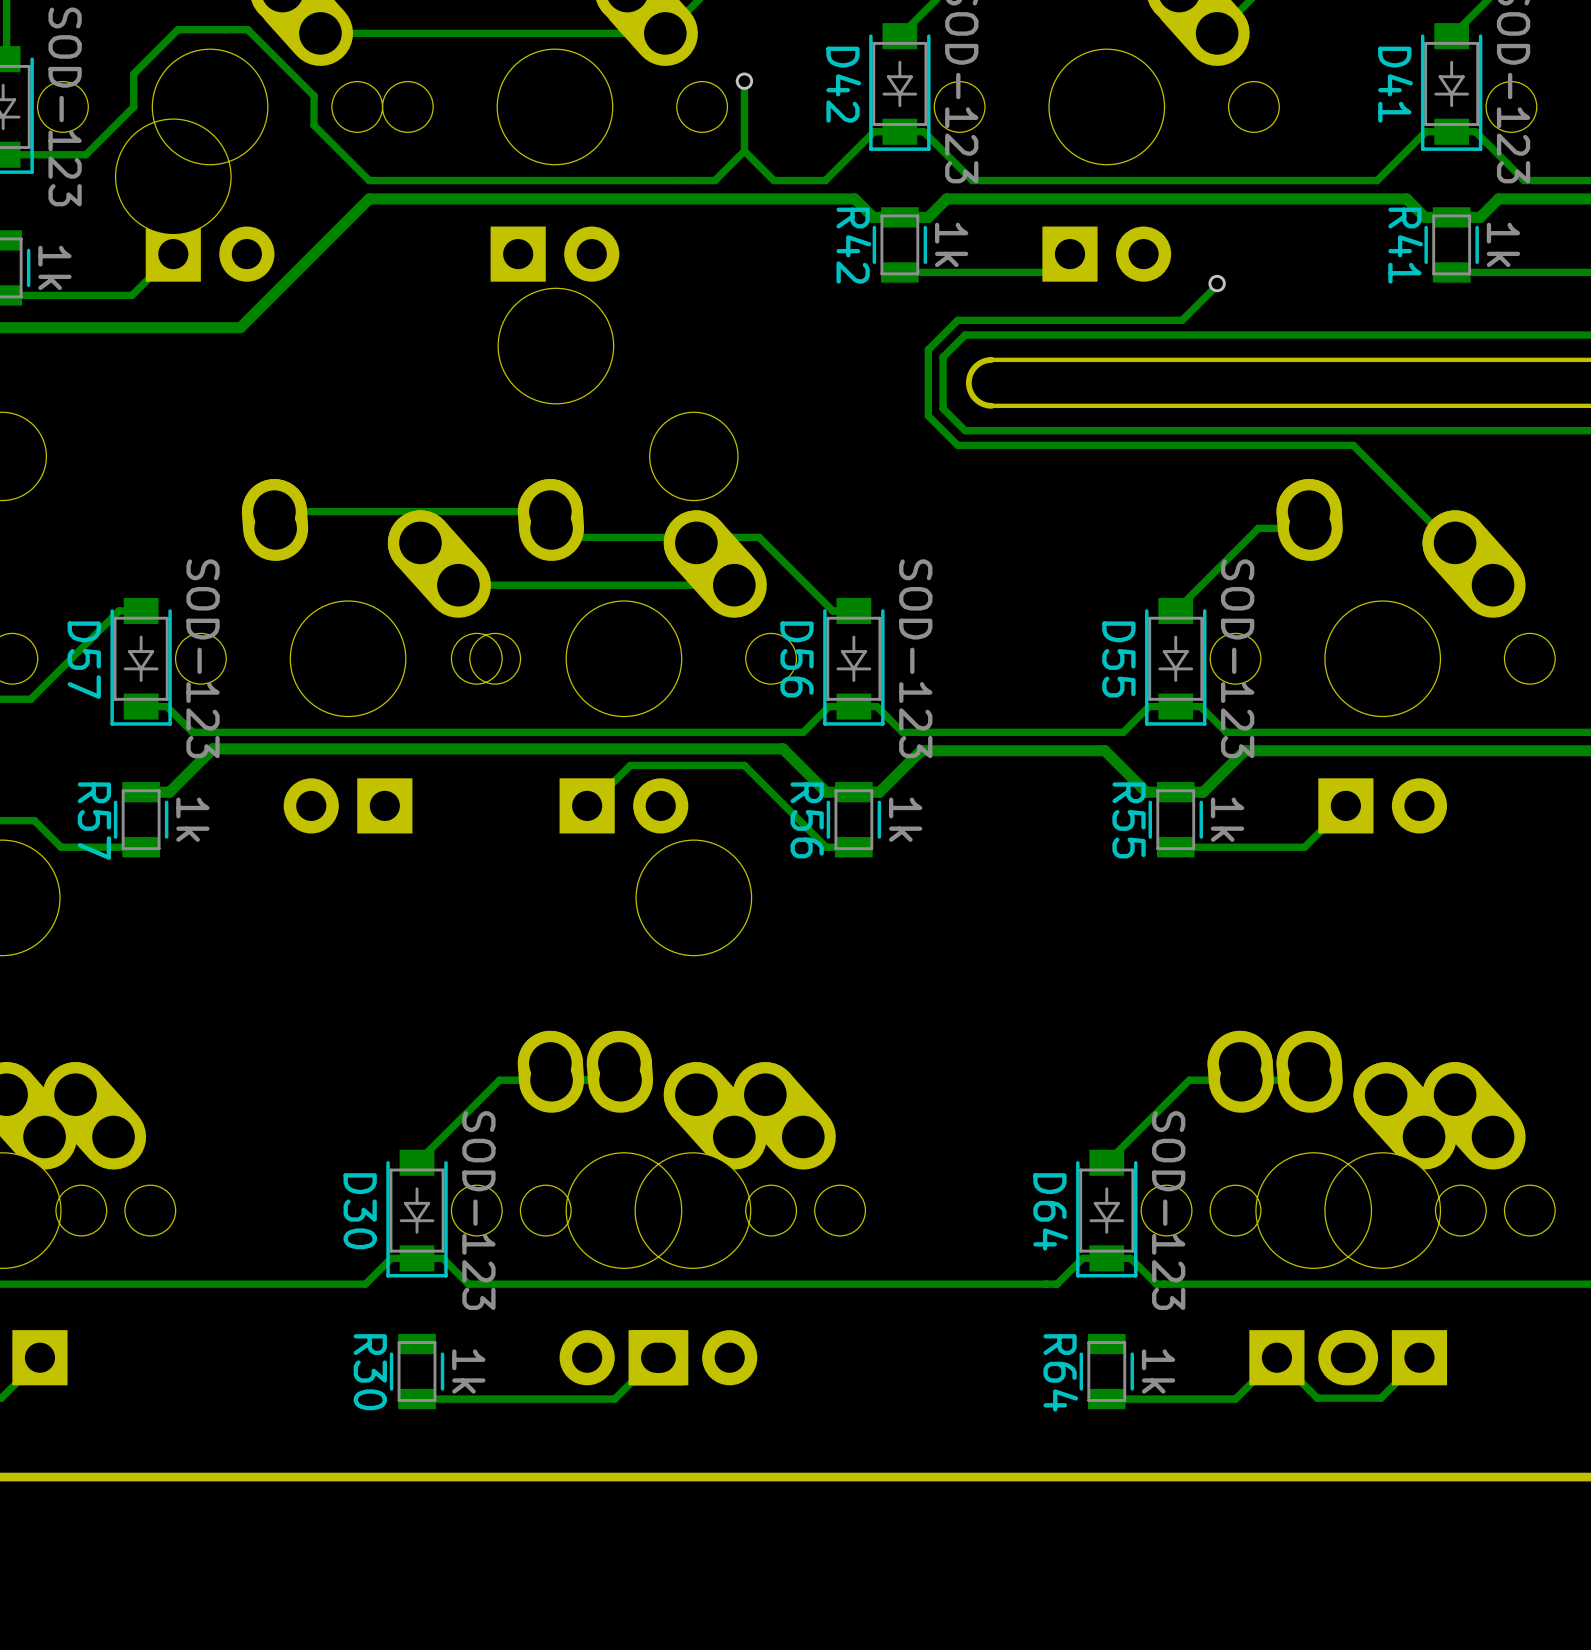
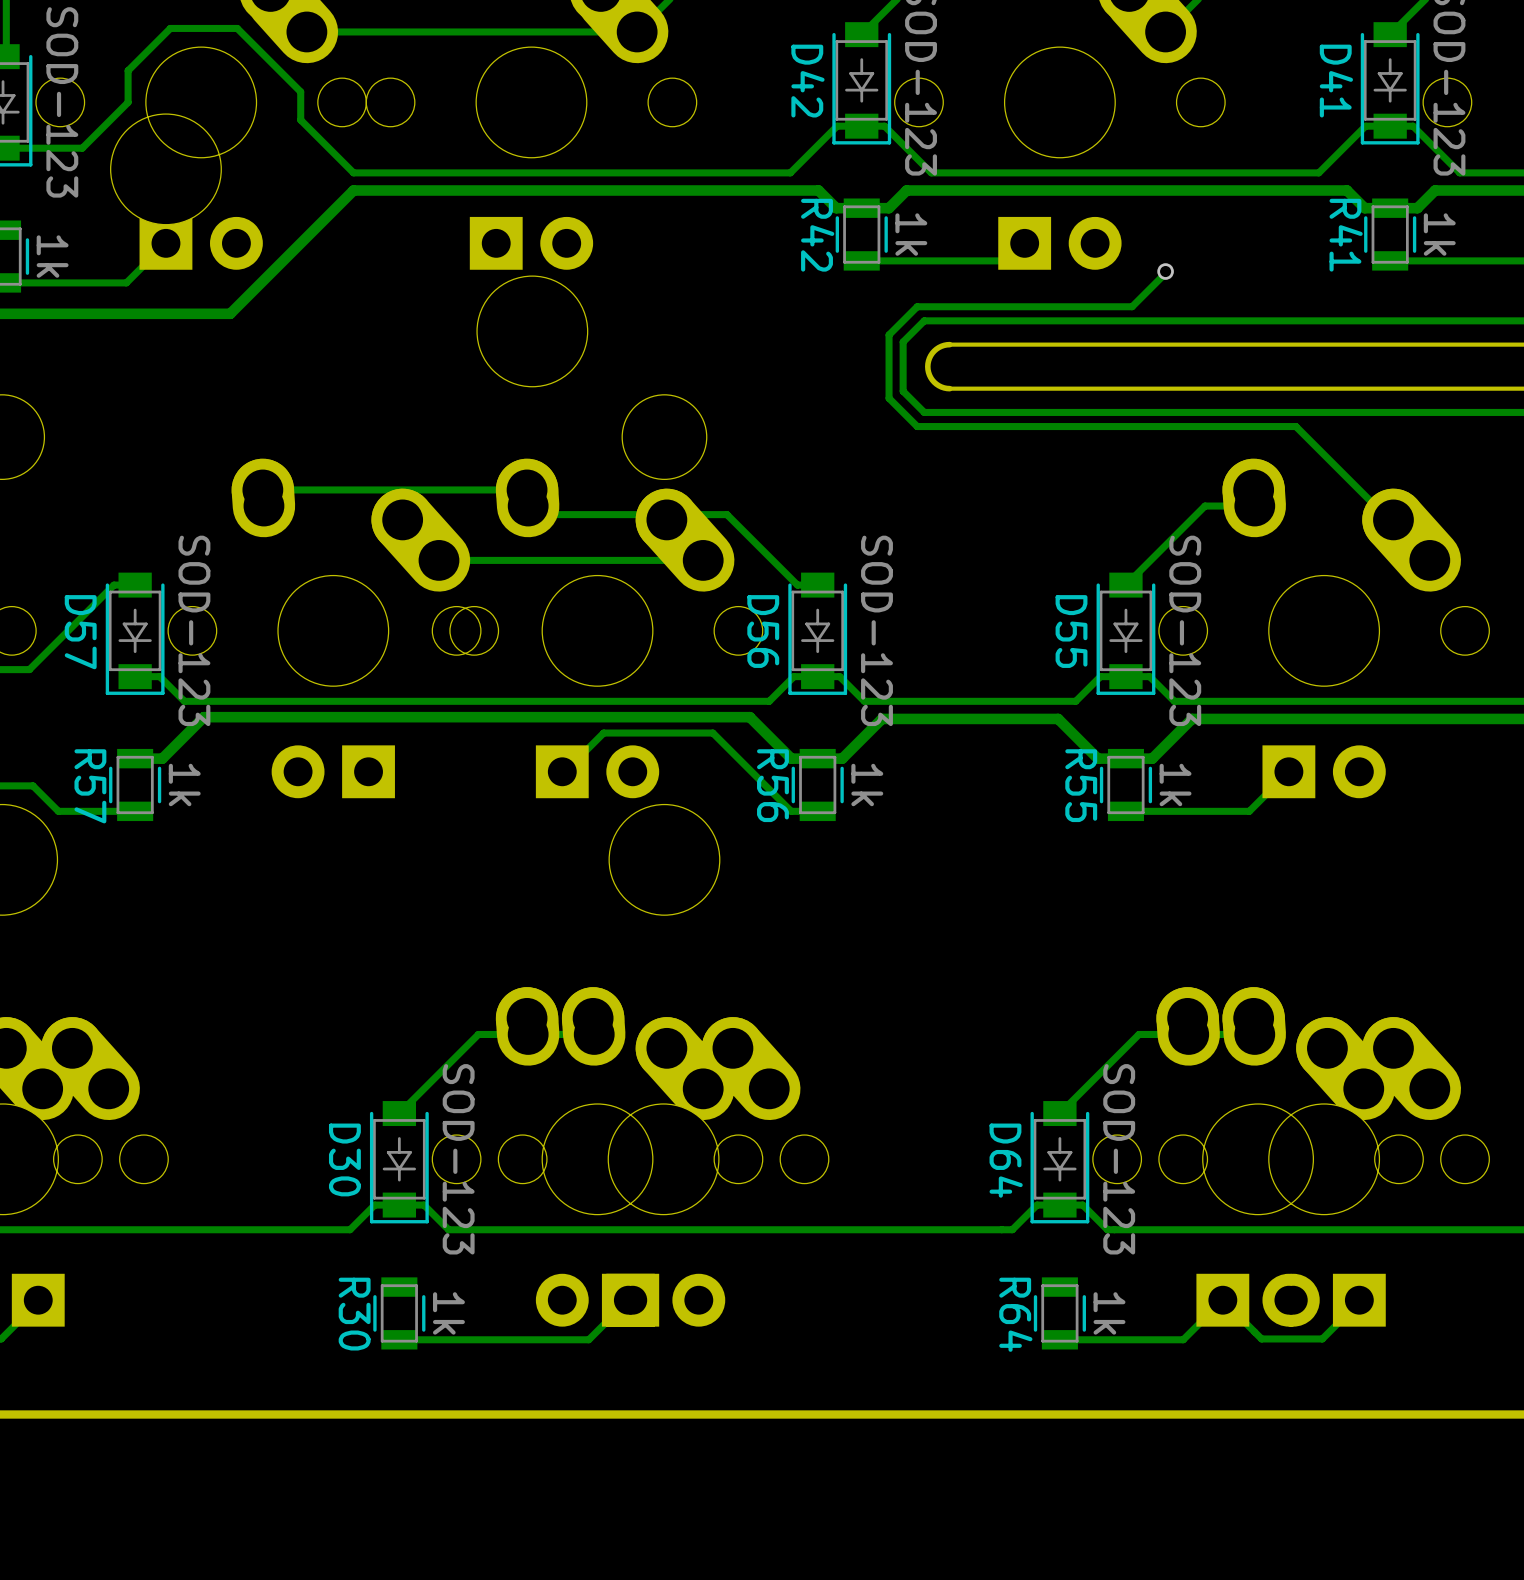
track: (744, 81) (744, 151) -> none
via: (744, 81) -> none
track: (744, 151) (715, 180) -> (741, 172) (684, 172)
track: (744, 151) (773, 180) -> none

